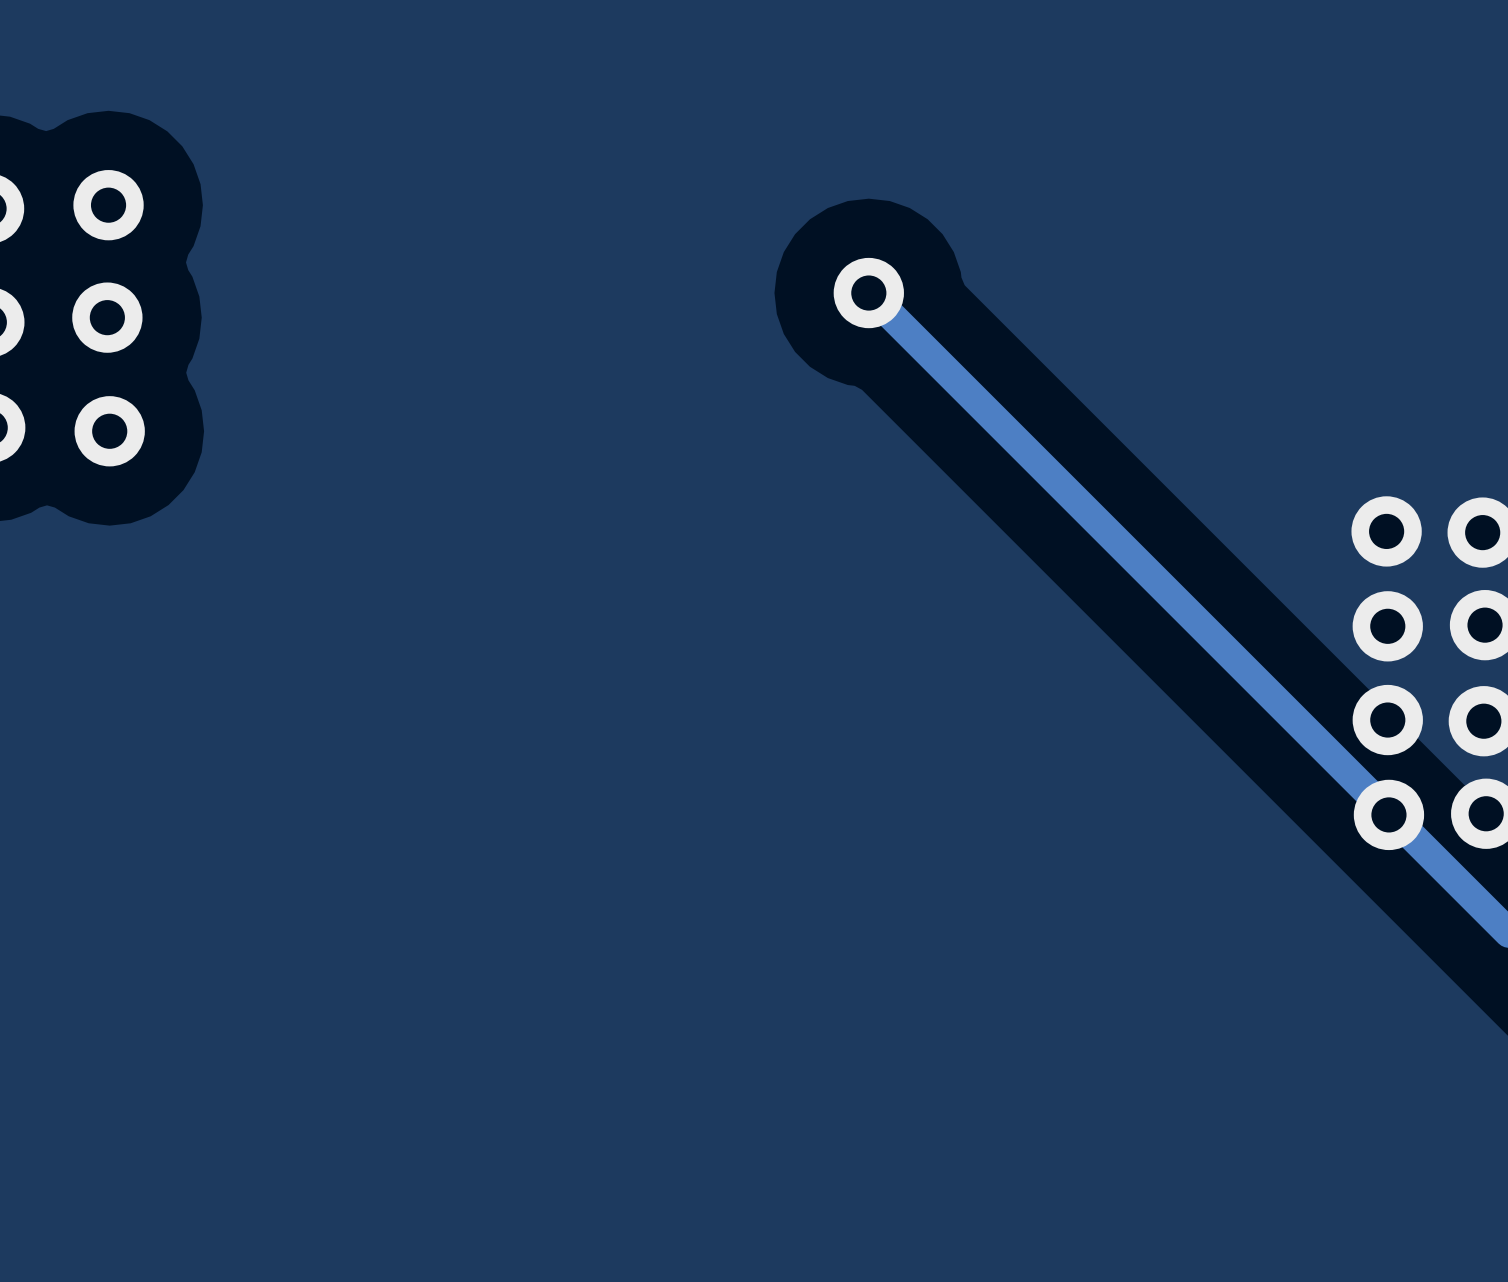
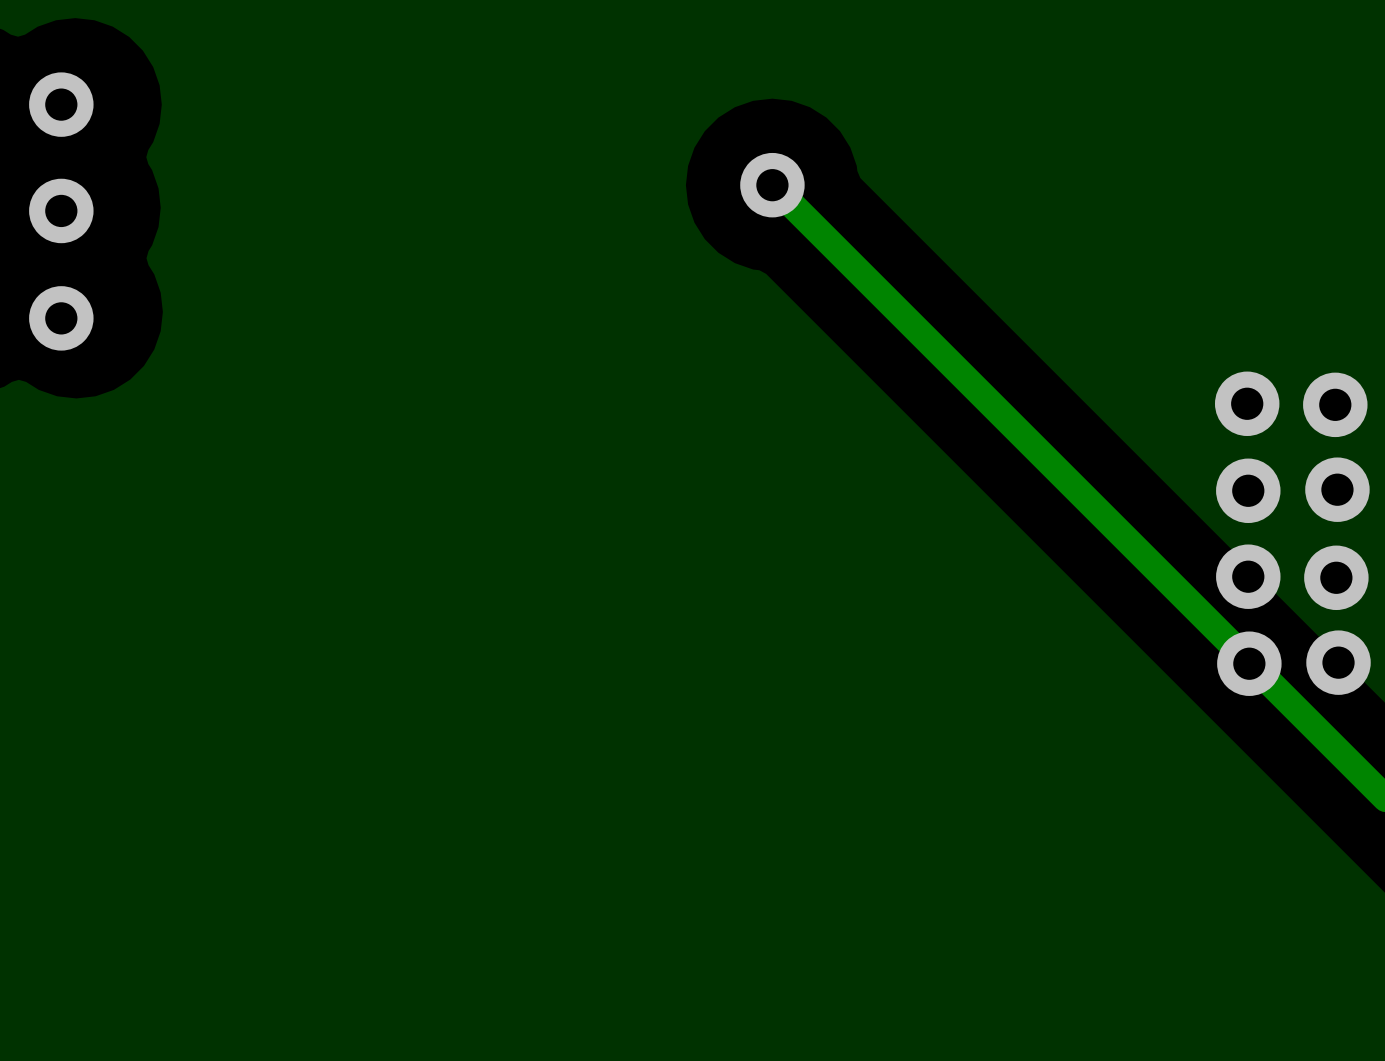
via position: (108, 205) -> (61, 104)
via position: (107, 317) -> (61, 210)
via position: (109, 431) -> (61, 318)

